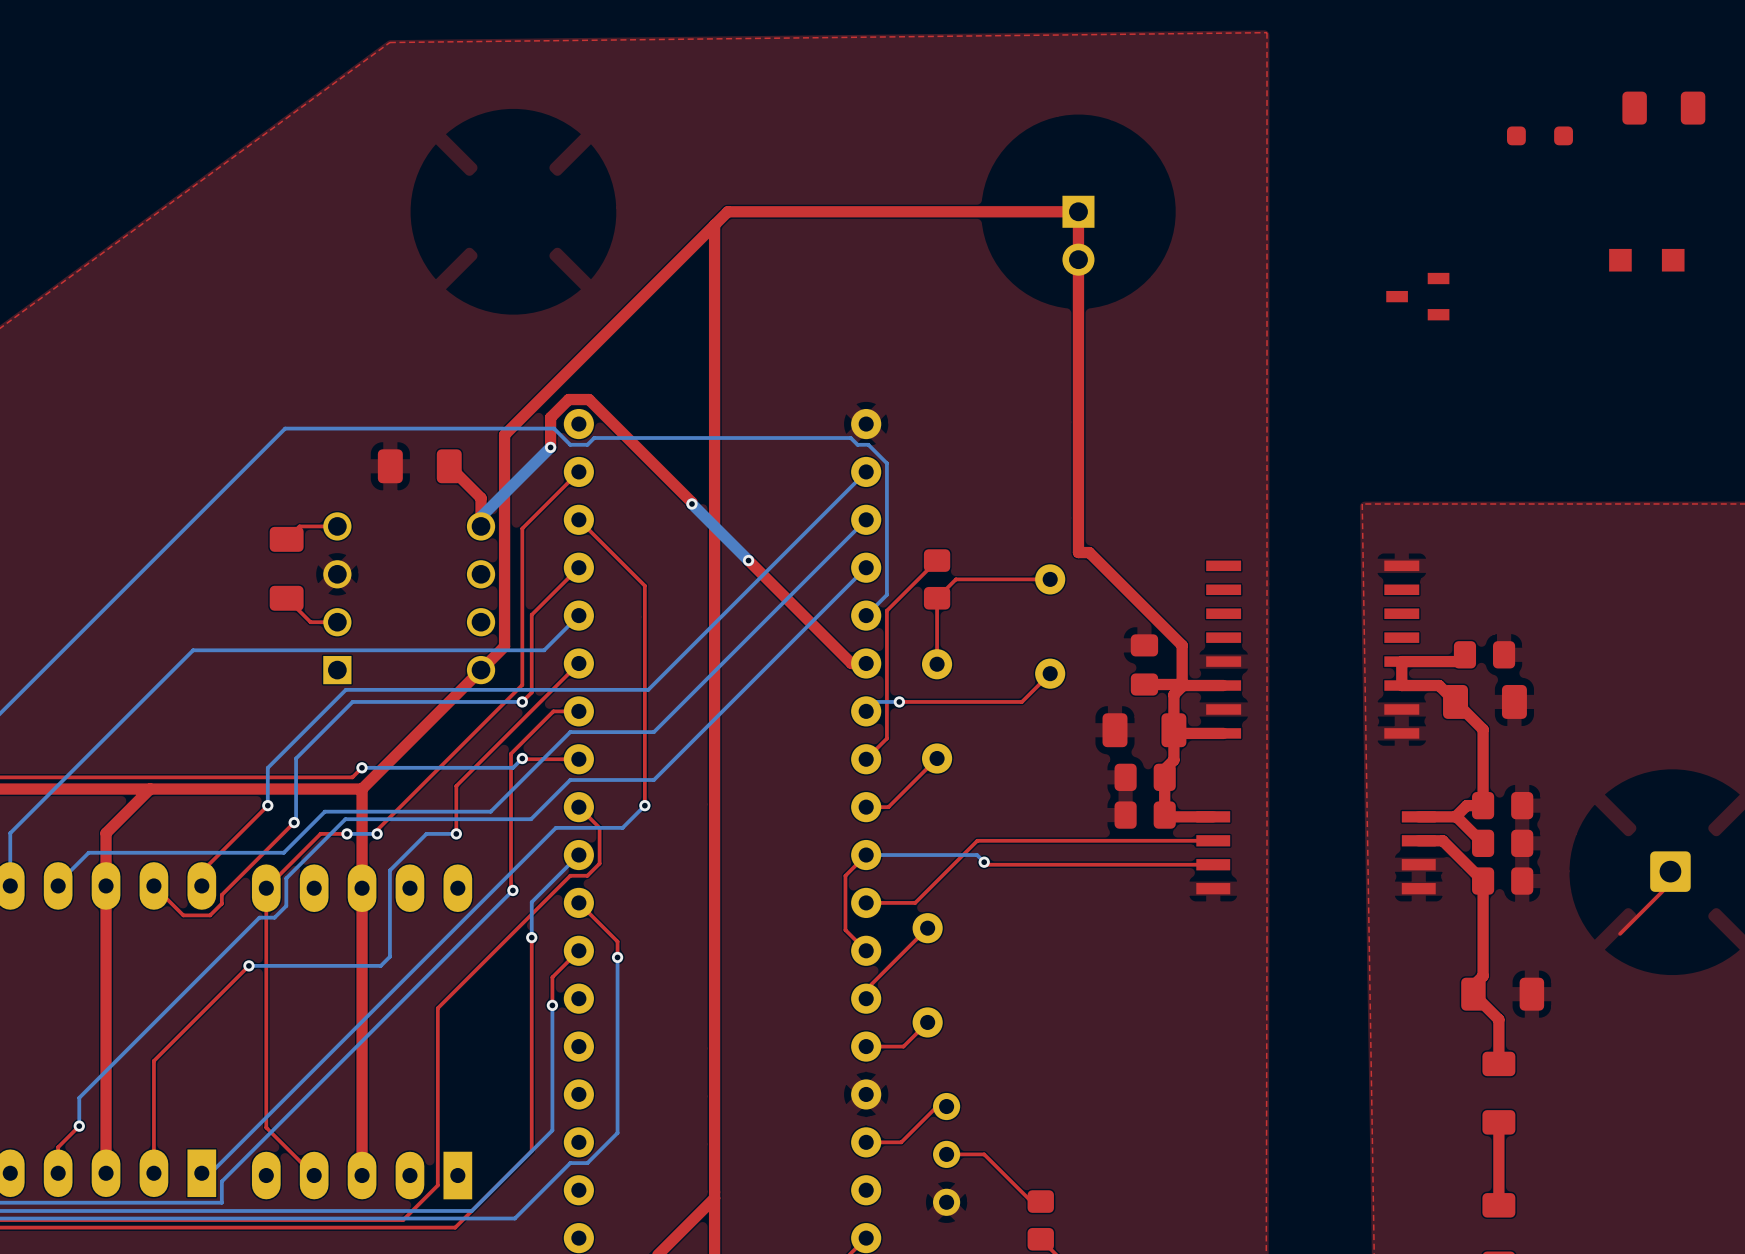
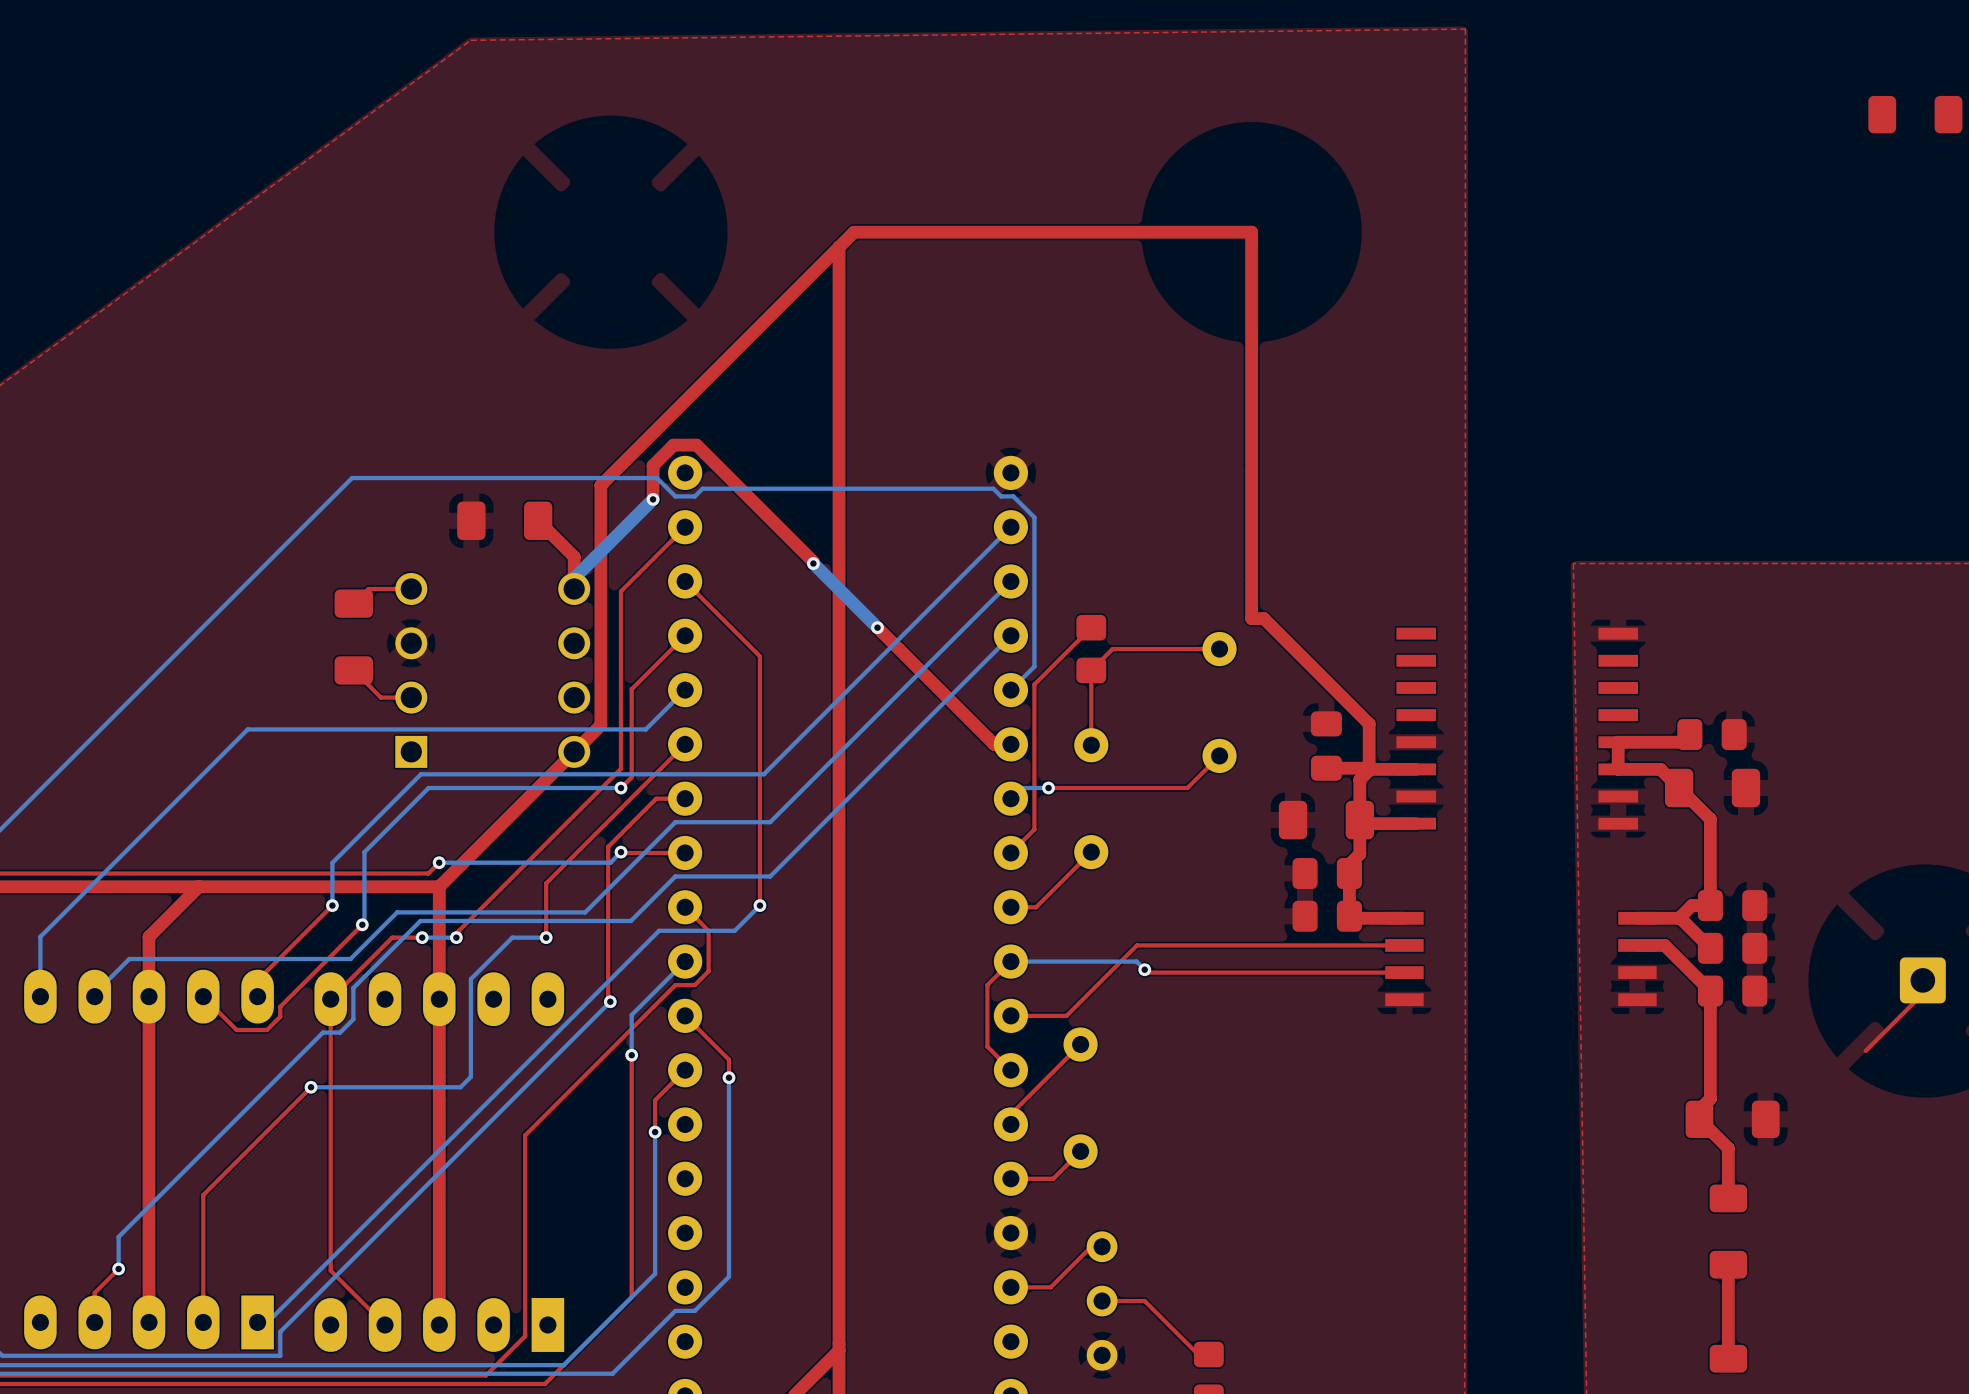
part: (1539, 135) -> none
part: (1078, 235) -> none
part: (1646, 260) -> none
part: (1417, 296) -> none

